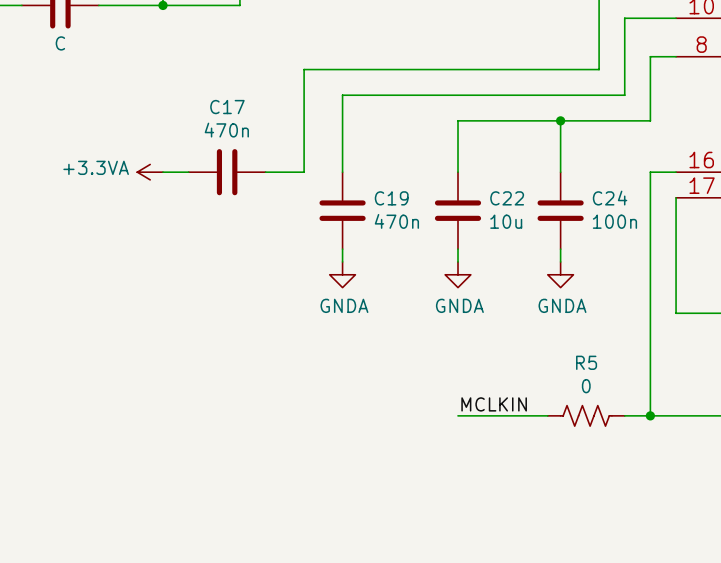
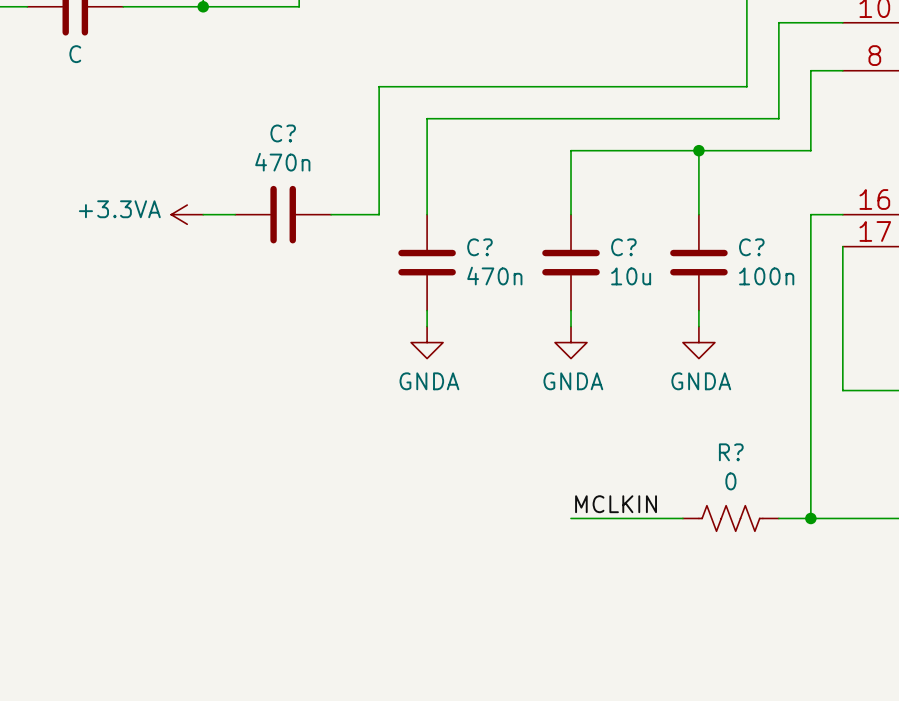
C17 name: C17 (227, 107) -> C? (283, 133)
C19 name: C19 (391, 198) -> C? (479, 247)
C22 name: C22 (507, 198) -> C? (623, 247)
C24 name: C24 (610, 198) -> C? (751, 247)
R5 name: R5 (586, 362) -> R? (731, 452)

